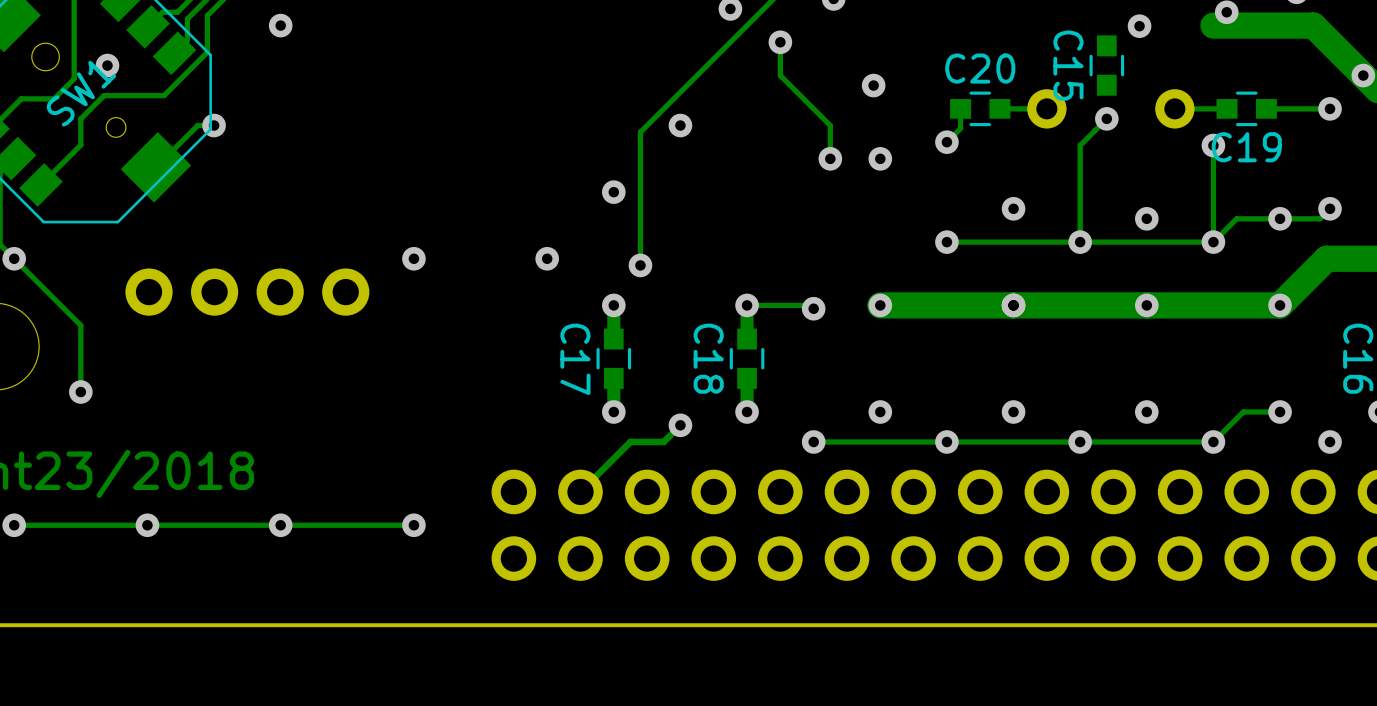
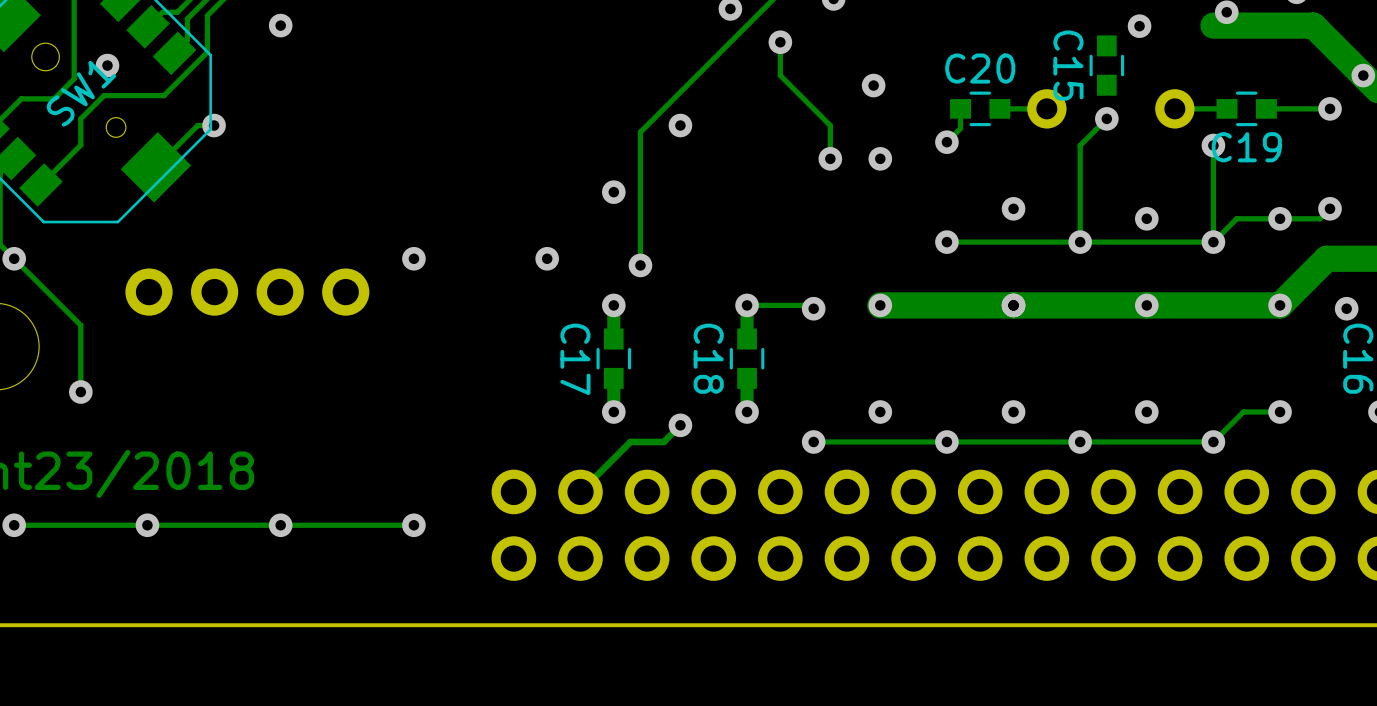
via: none -> (1346, 308)
via: (1330, 441) -> none

